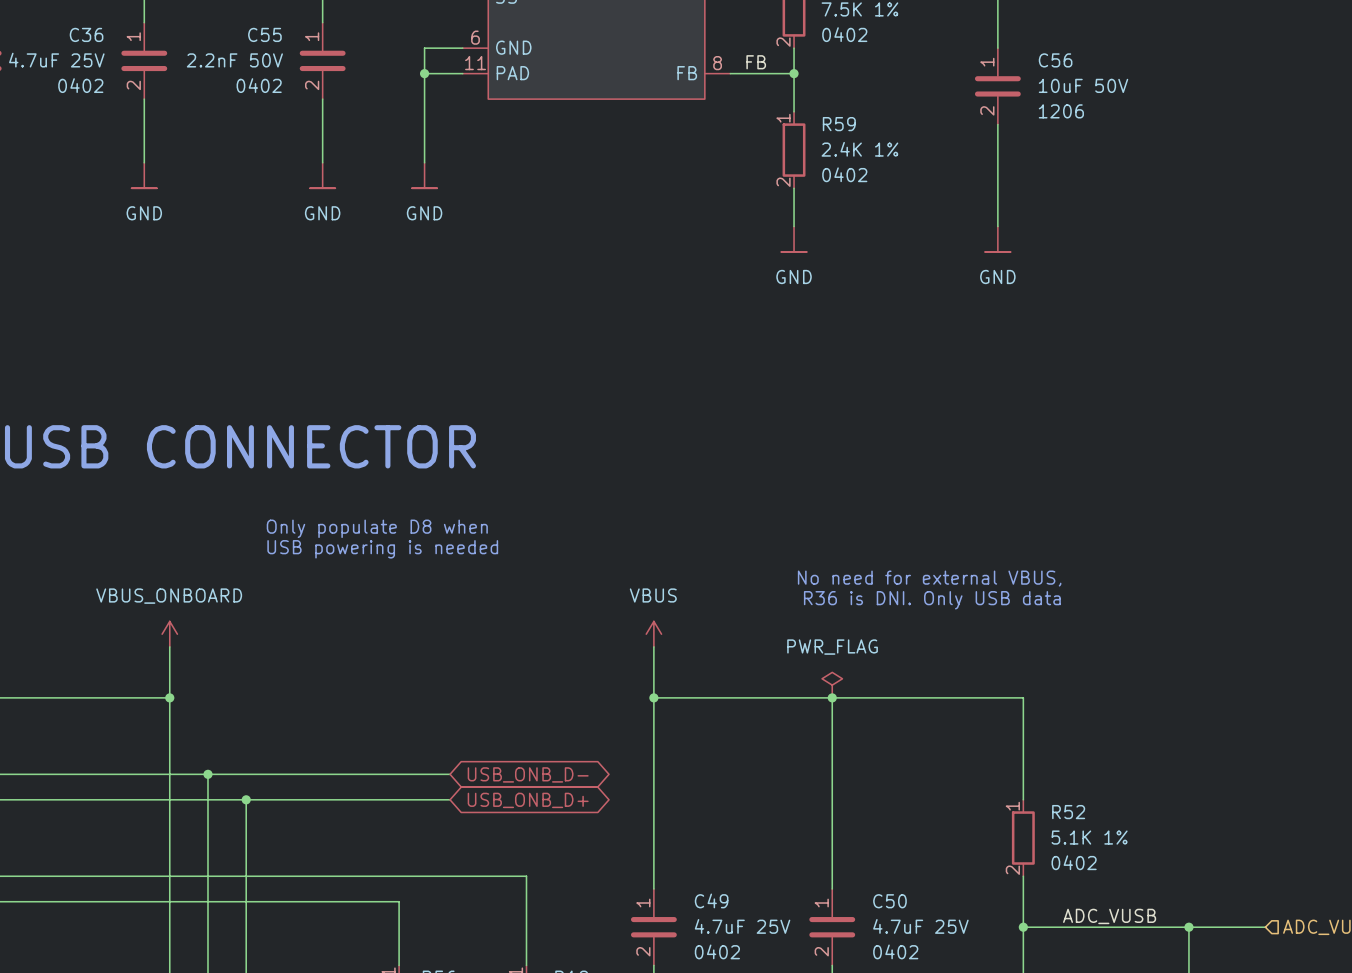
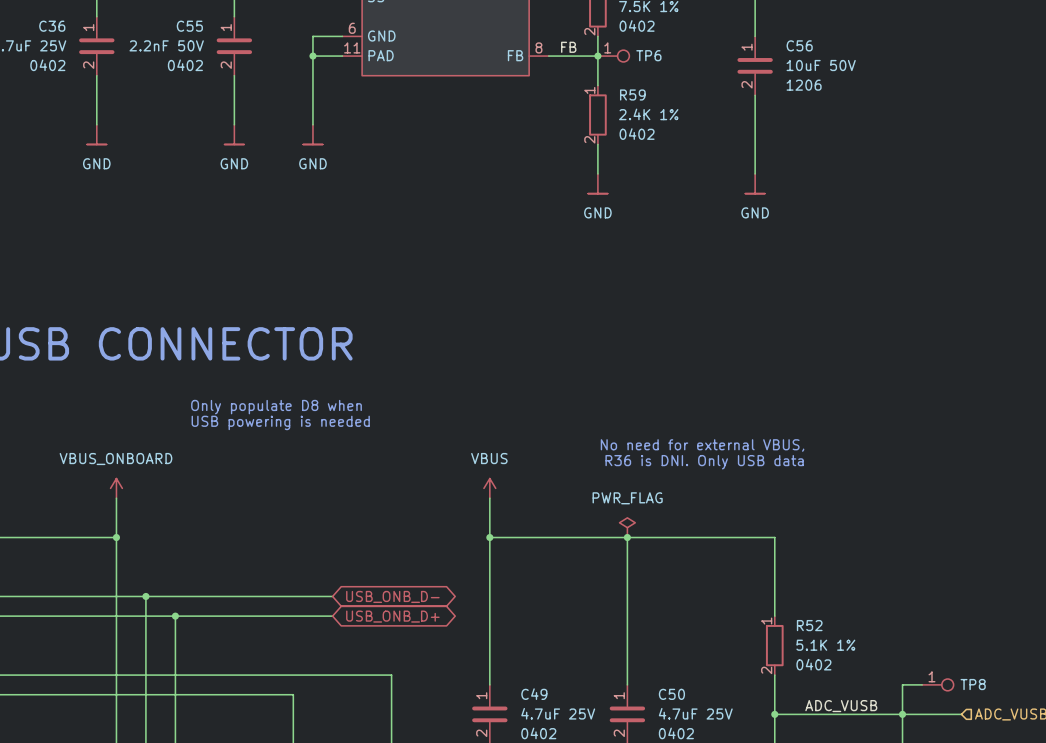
TP6: none -> (613, 56)
wire: none -> (922, 684) (902, 684) (902, 714)
TP8: none -> (937, 684)

